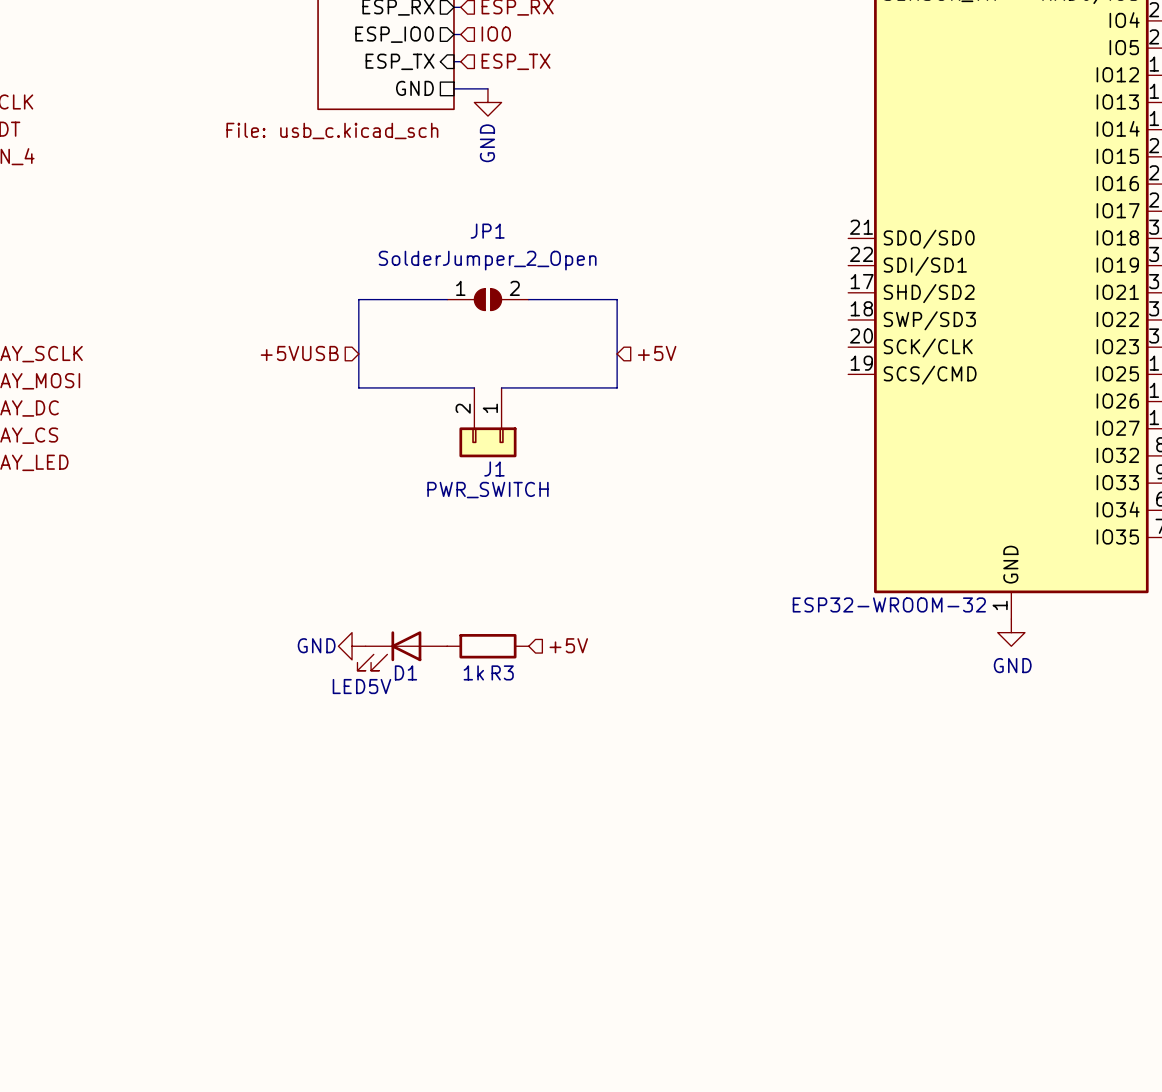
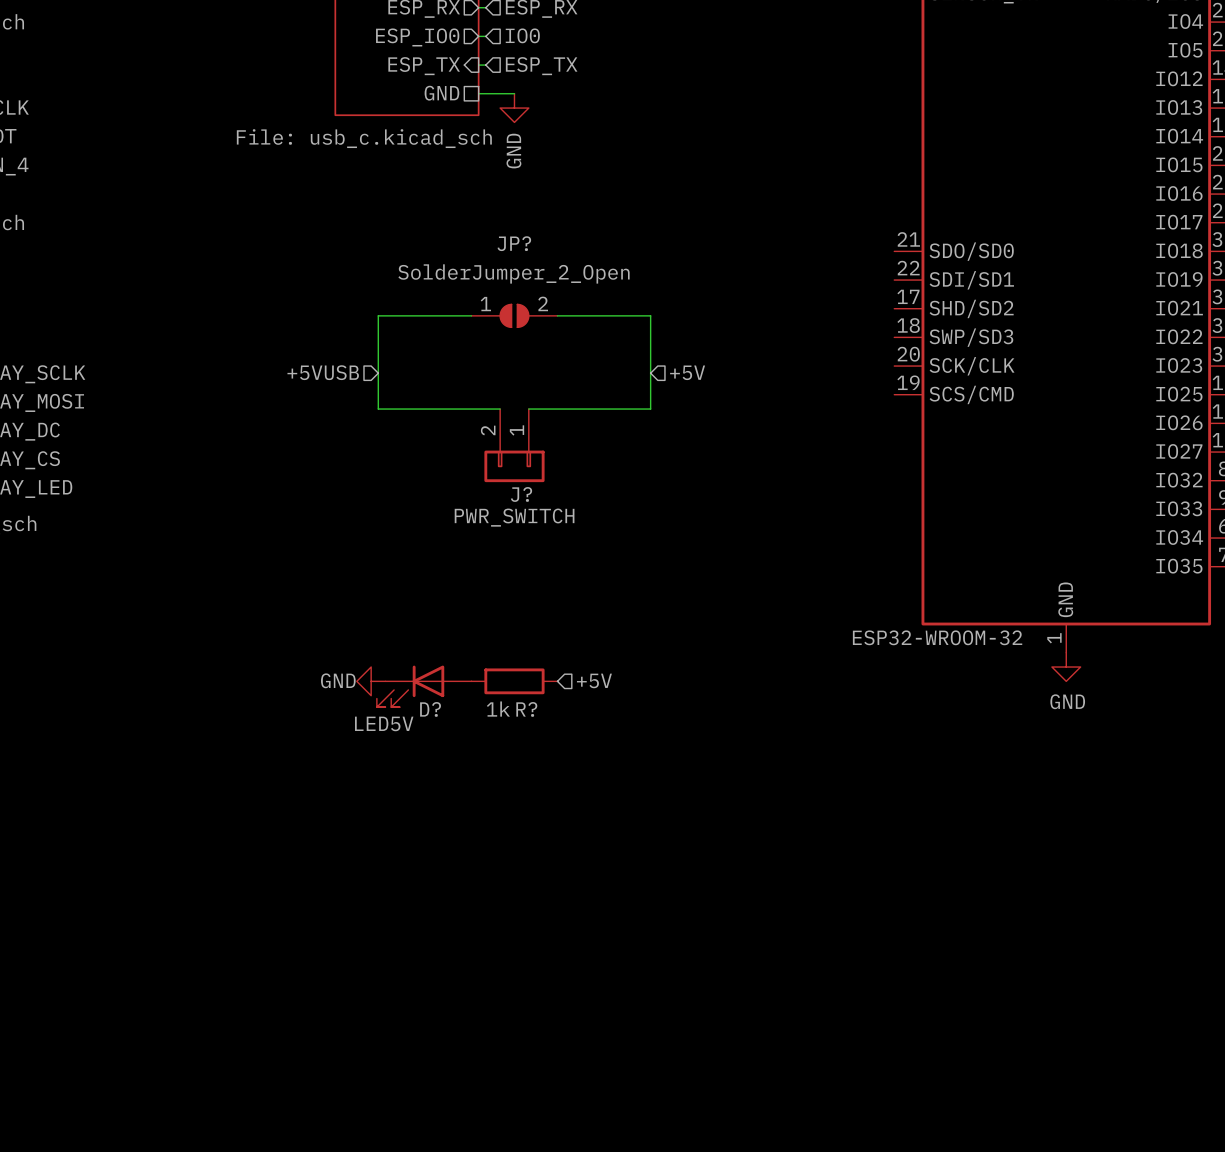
JP1 name: JP1 (487, 231) -> JP? (514, 243)
J1 name: J1 (494, 469) -> J? (521, 494)
D1 name: D1 (405, 672) -> D? (430, 709)
R3 name: R3 (502, 672) -> R? (526, 709)

